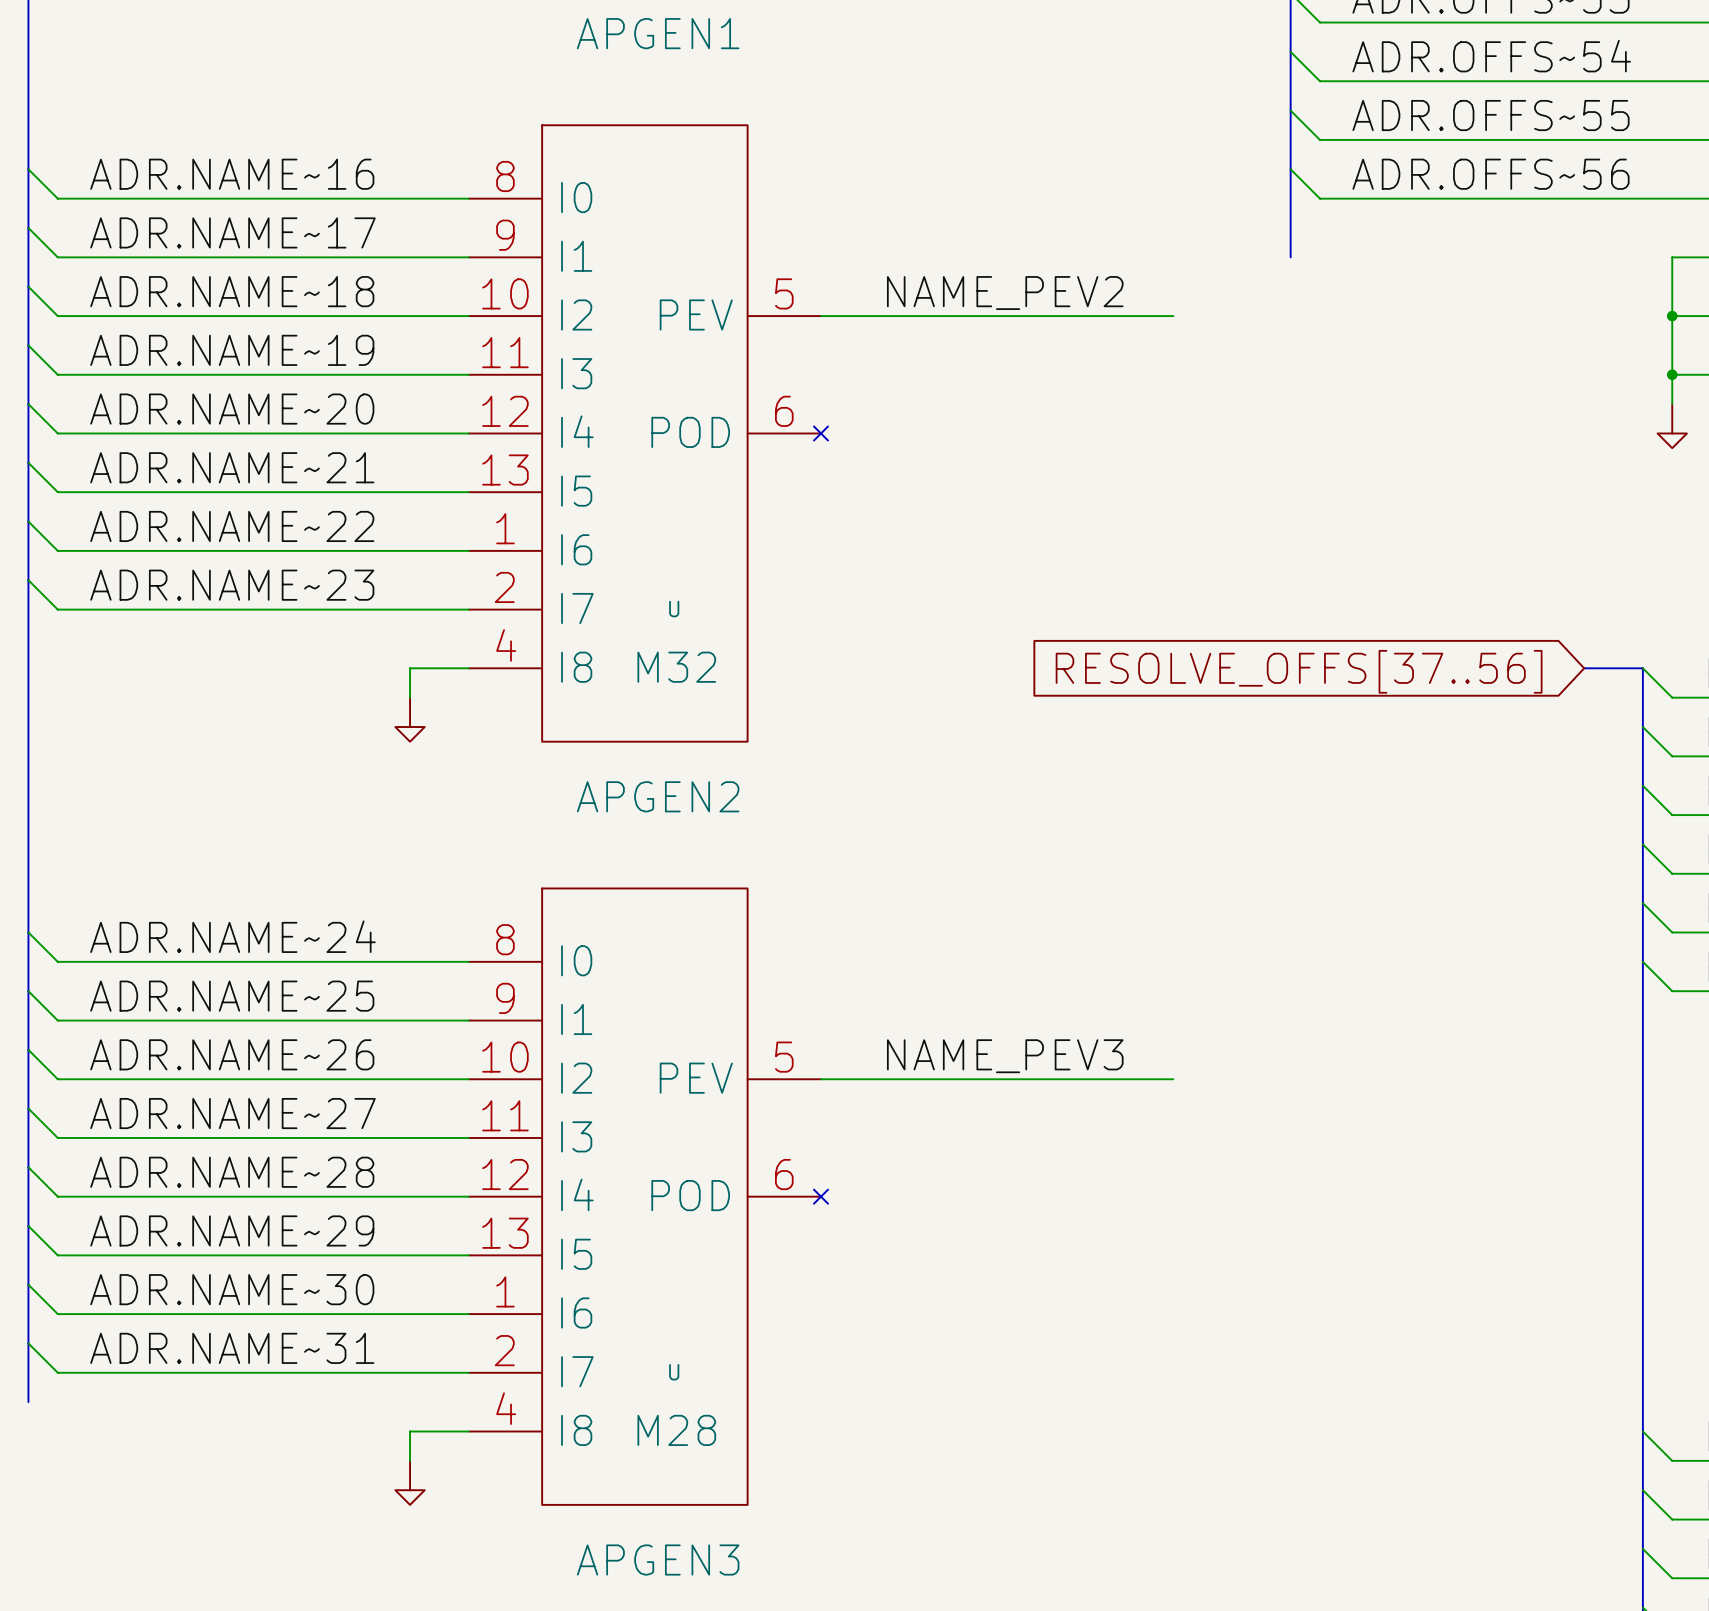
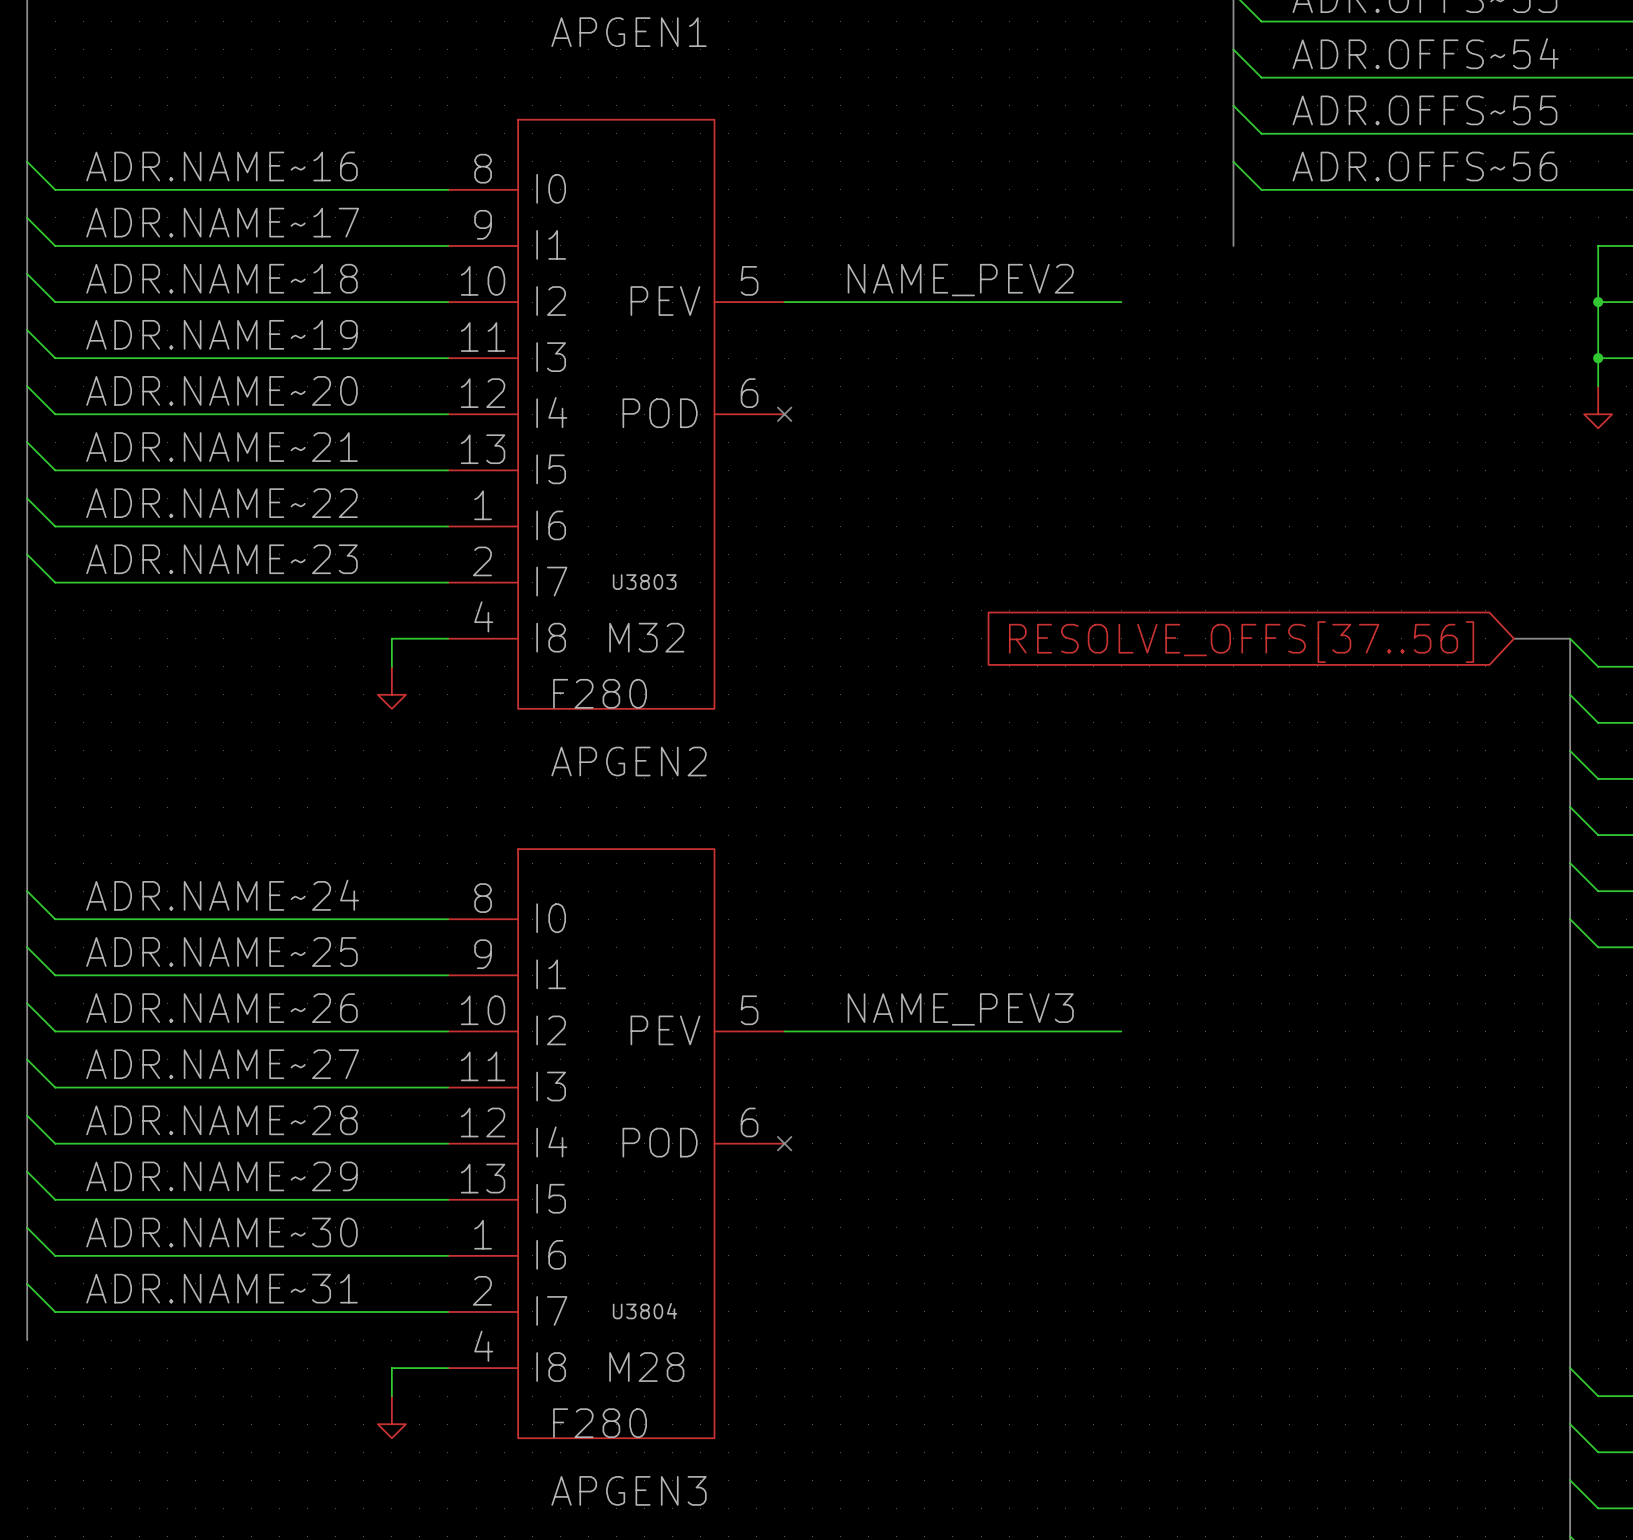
U name: U (674, 609) -> U3803 (644, 582)
U value: none -> F280 (600, 693)
U name: U (674, 1372) -> U3804 (645, 1311)
U value: none -> F280 (600, 1423)

